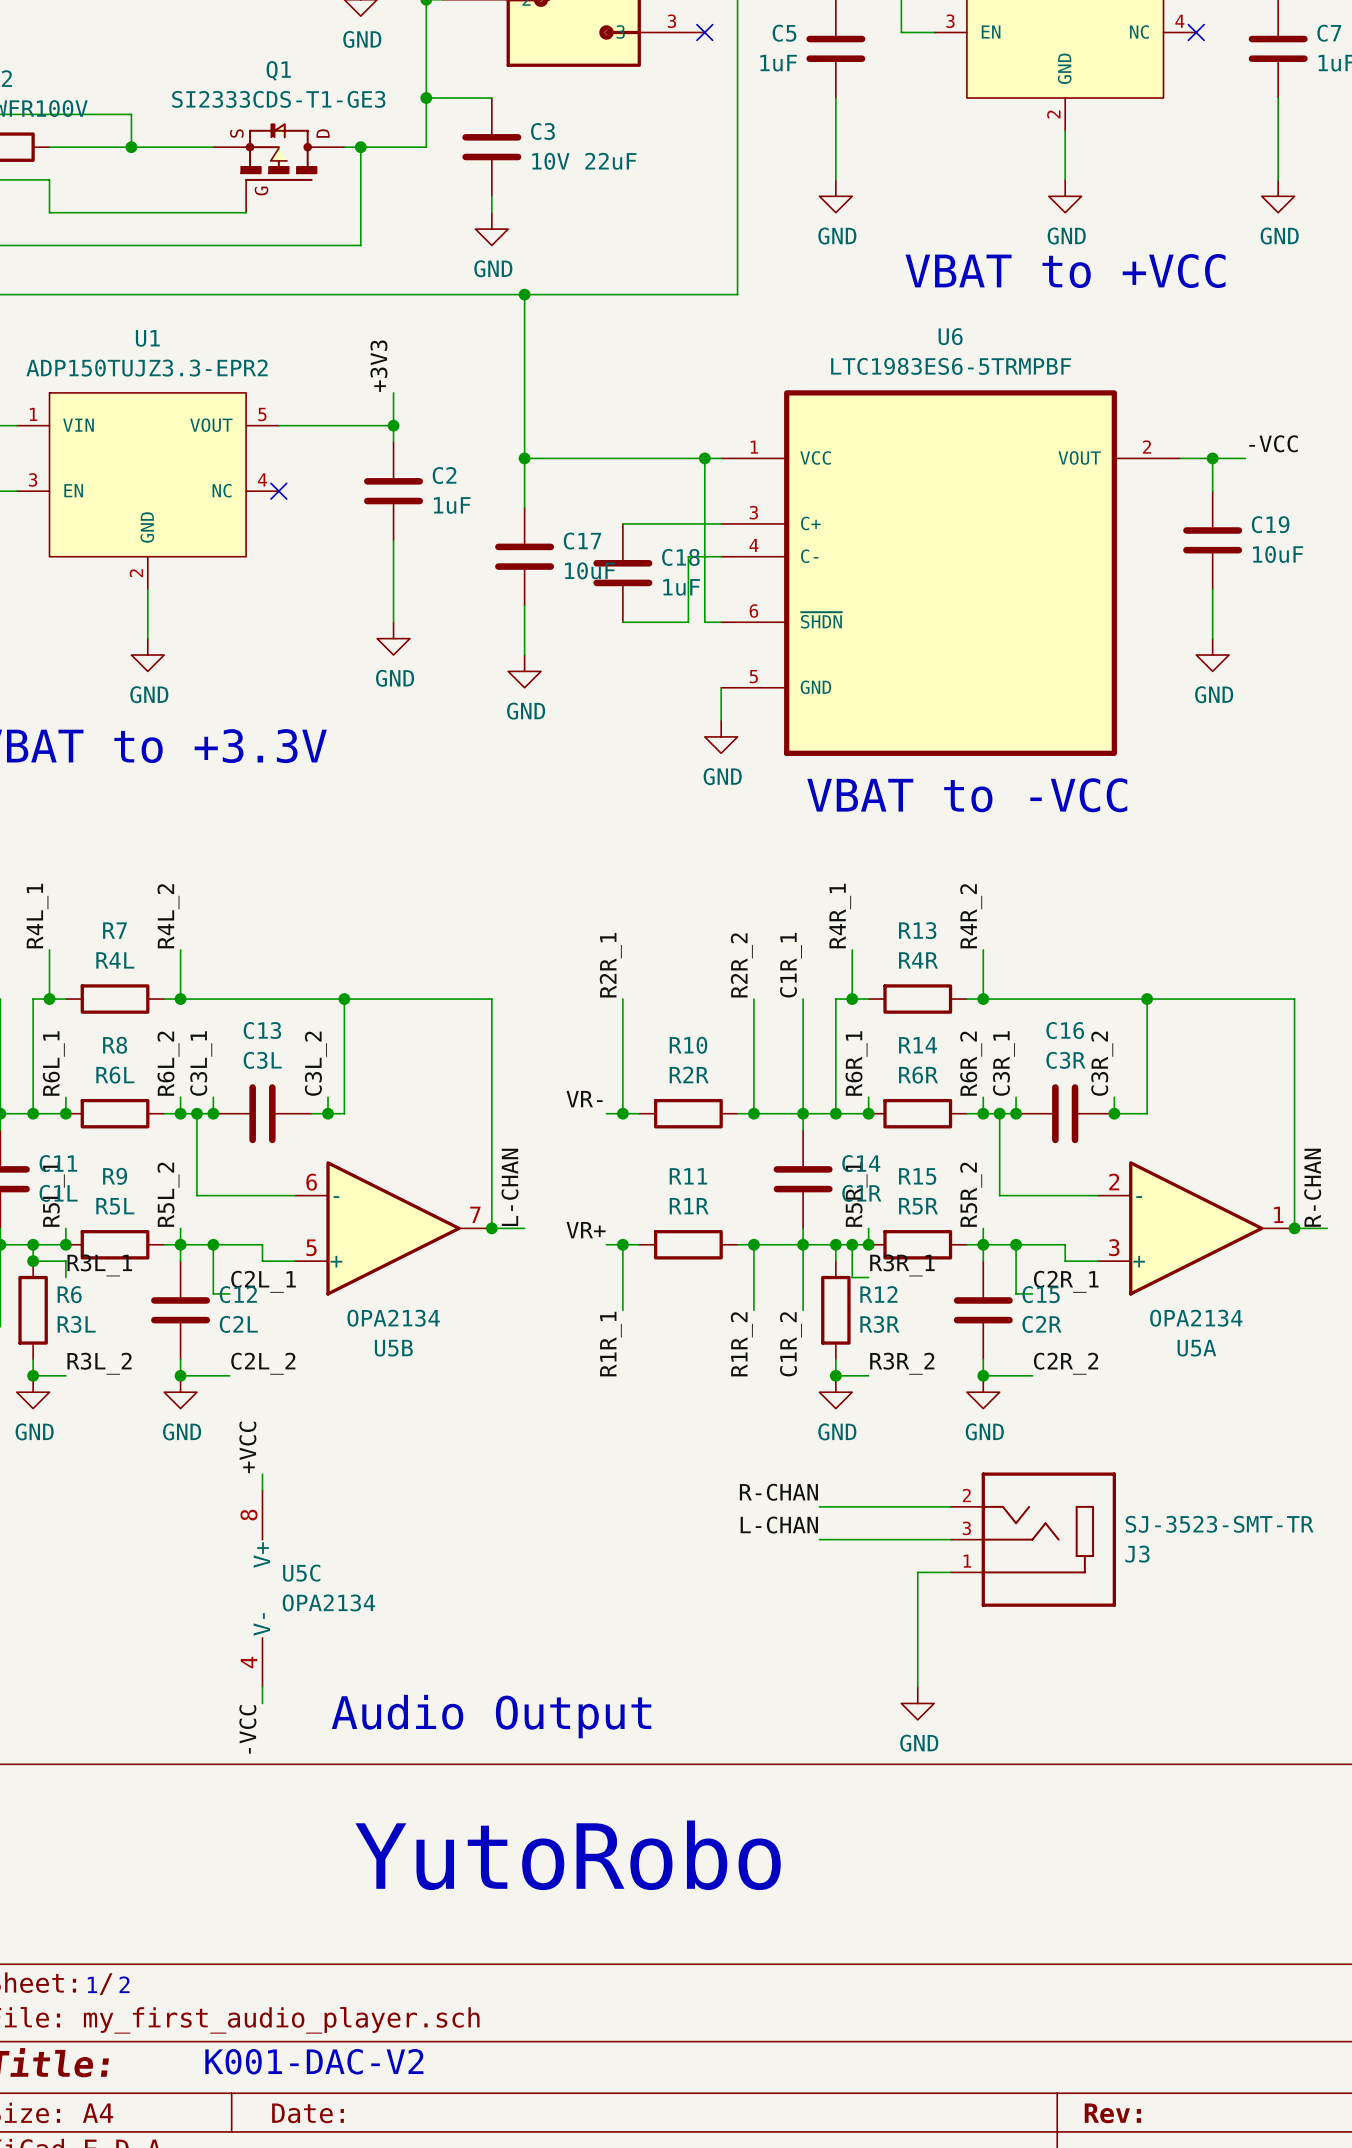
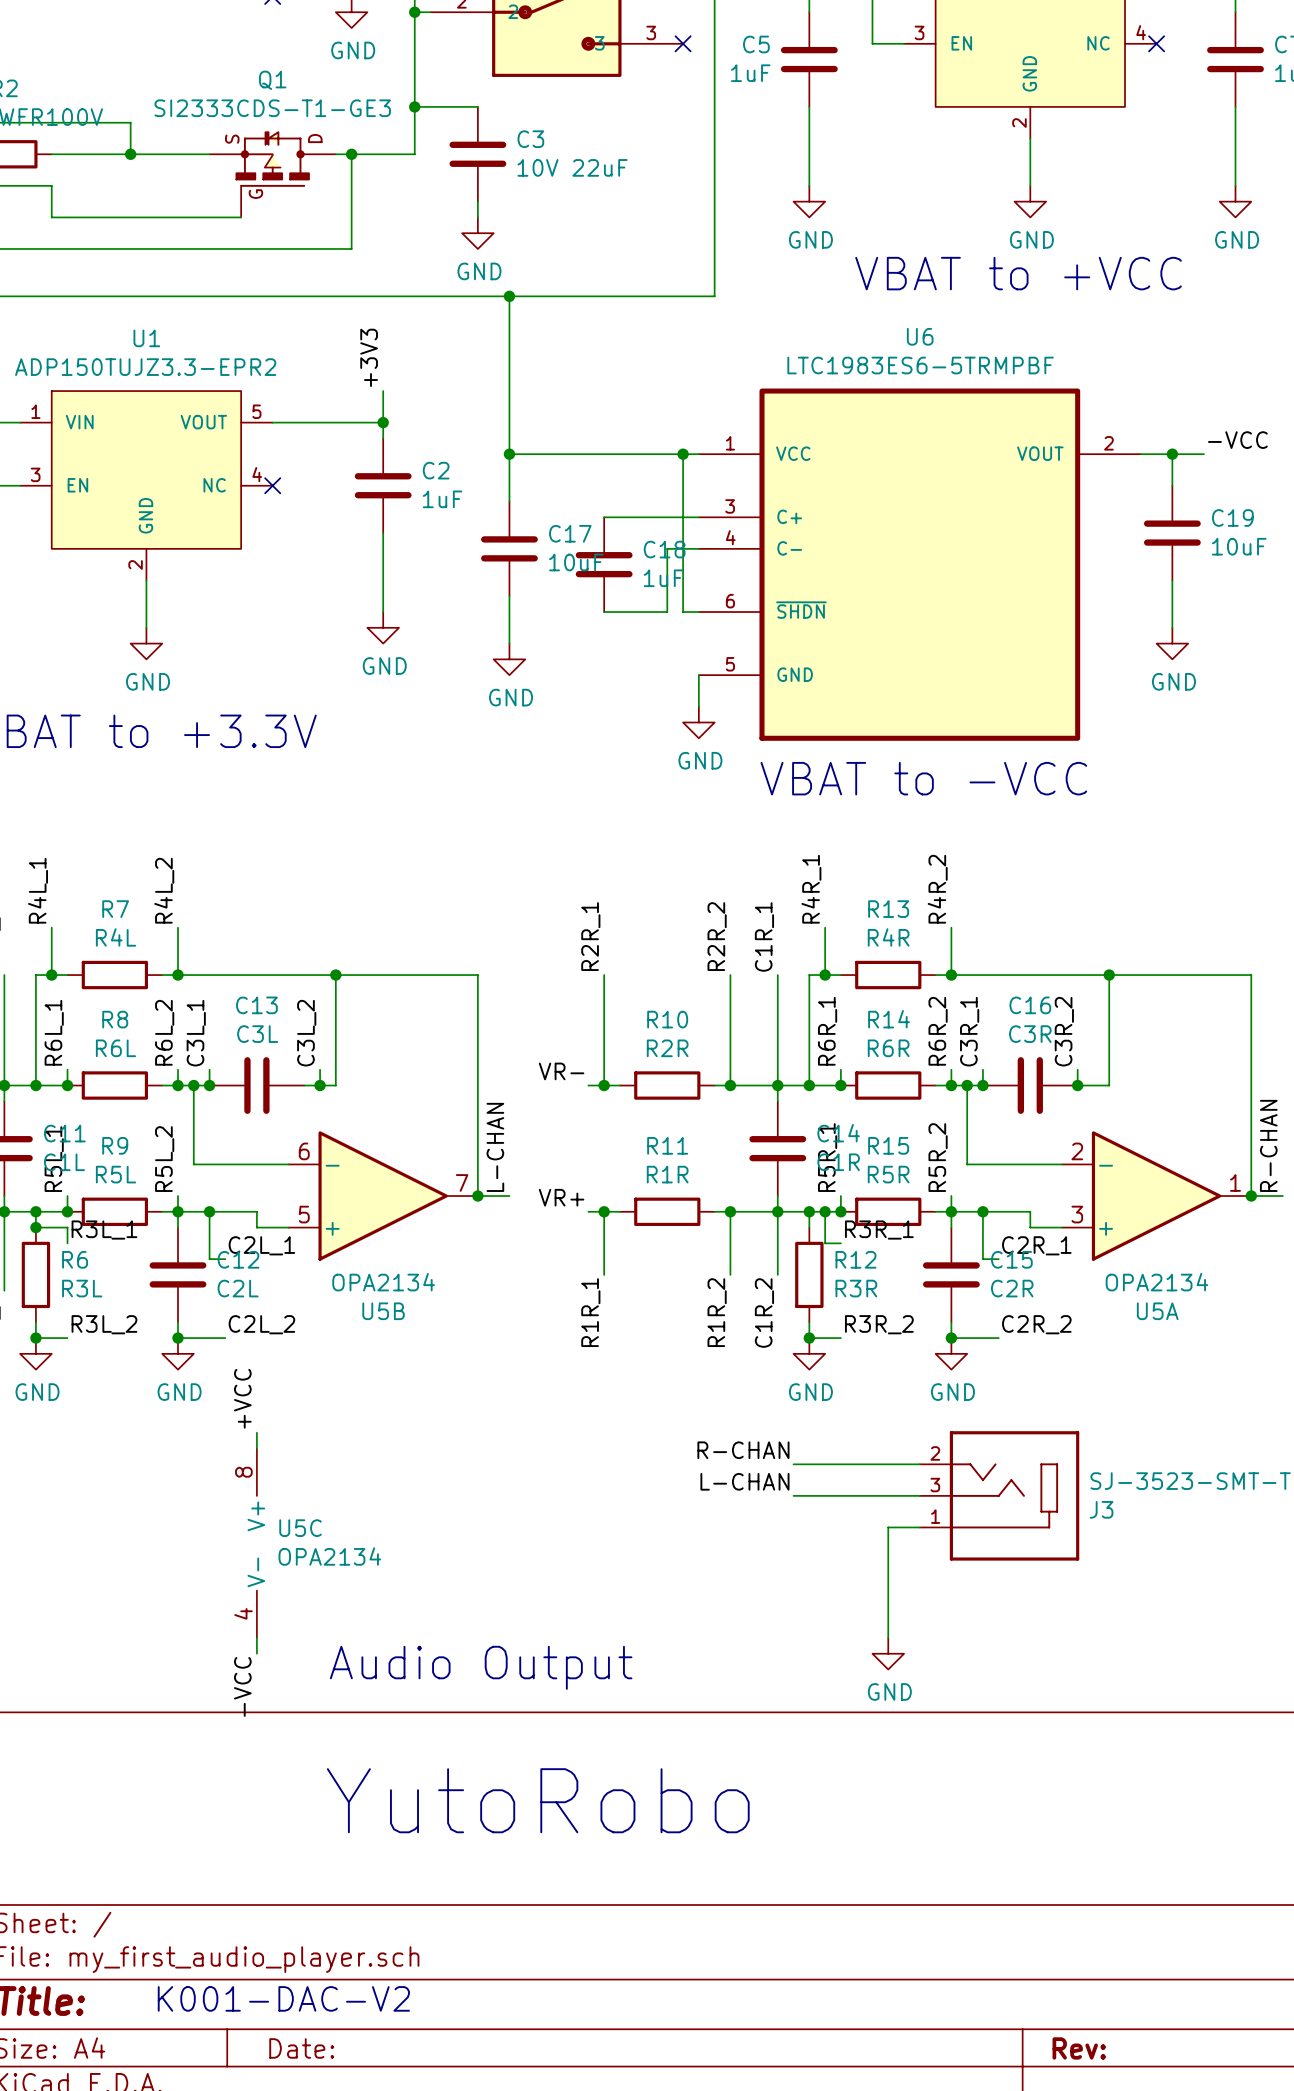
text: 1 (92, 1984) -> none
text: 2 (124, 1984) -> none

